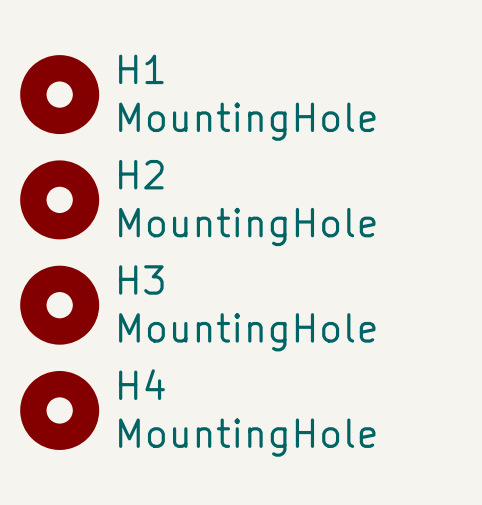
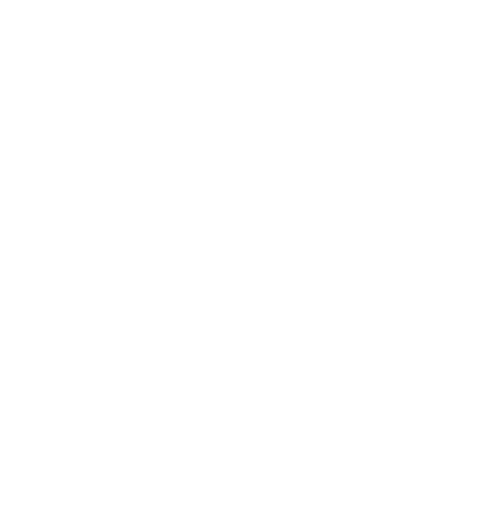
H1: MountingHole (59, 94) -> none
H2: MountingHole (59, 199) -> none
H3: MountingHole (59, 305) -> none
H4: MountingHole (59, 410) -> none

